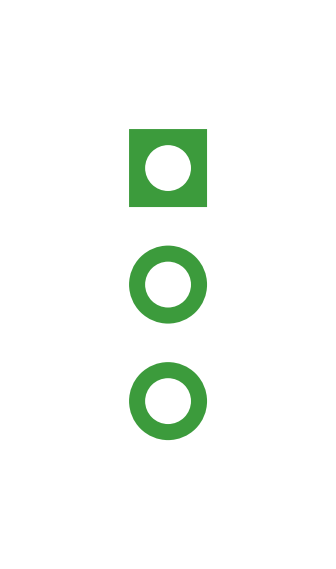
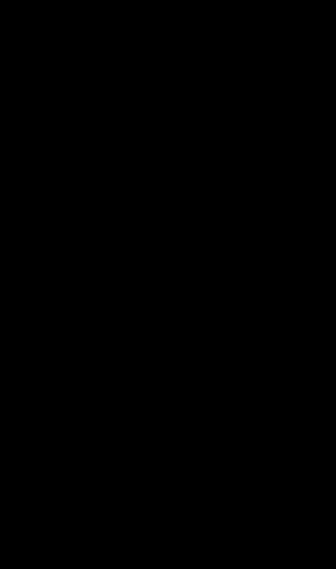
part: (168, 284) -> none

